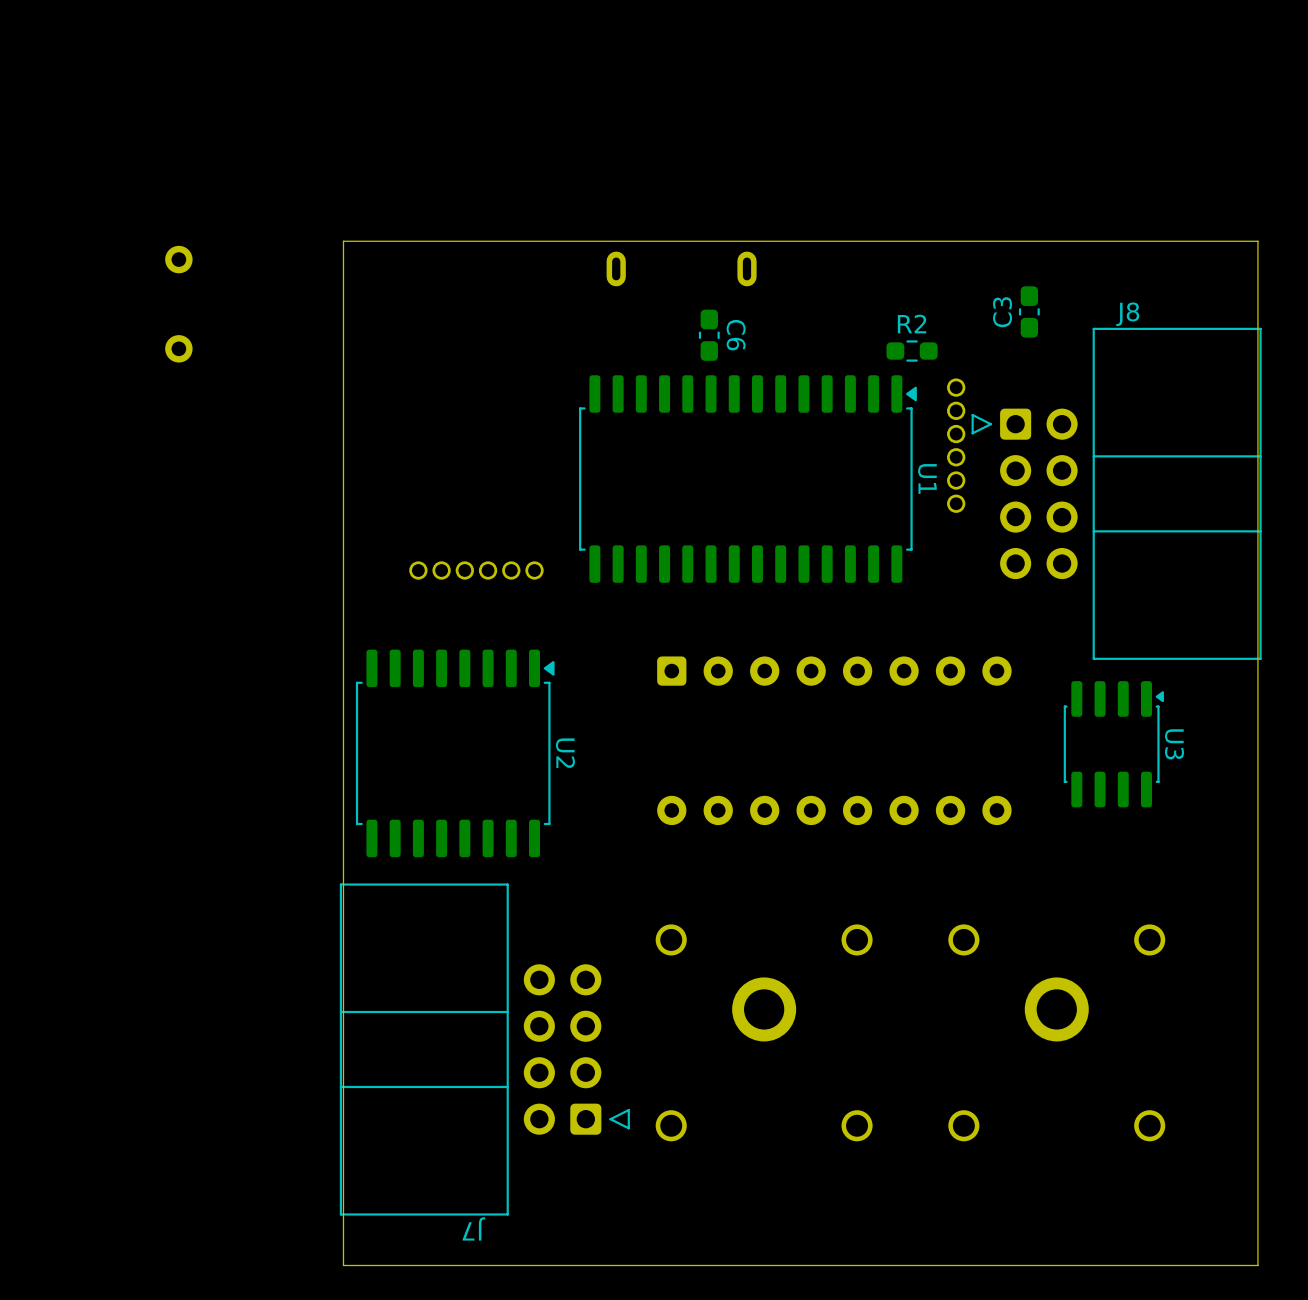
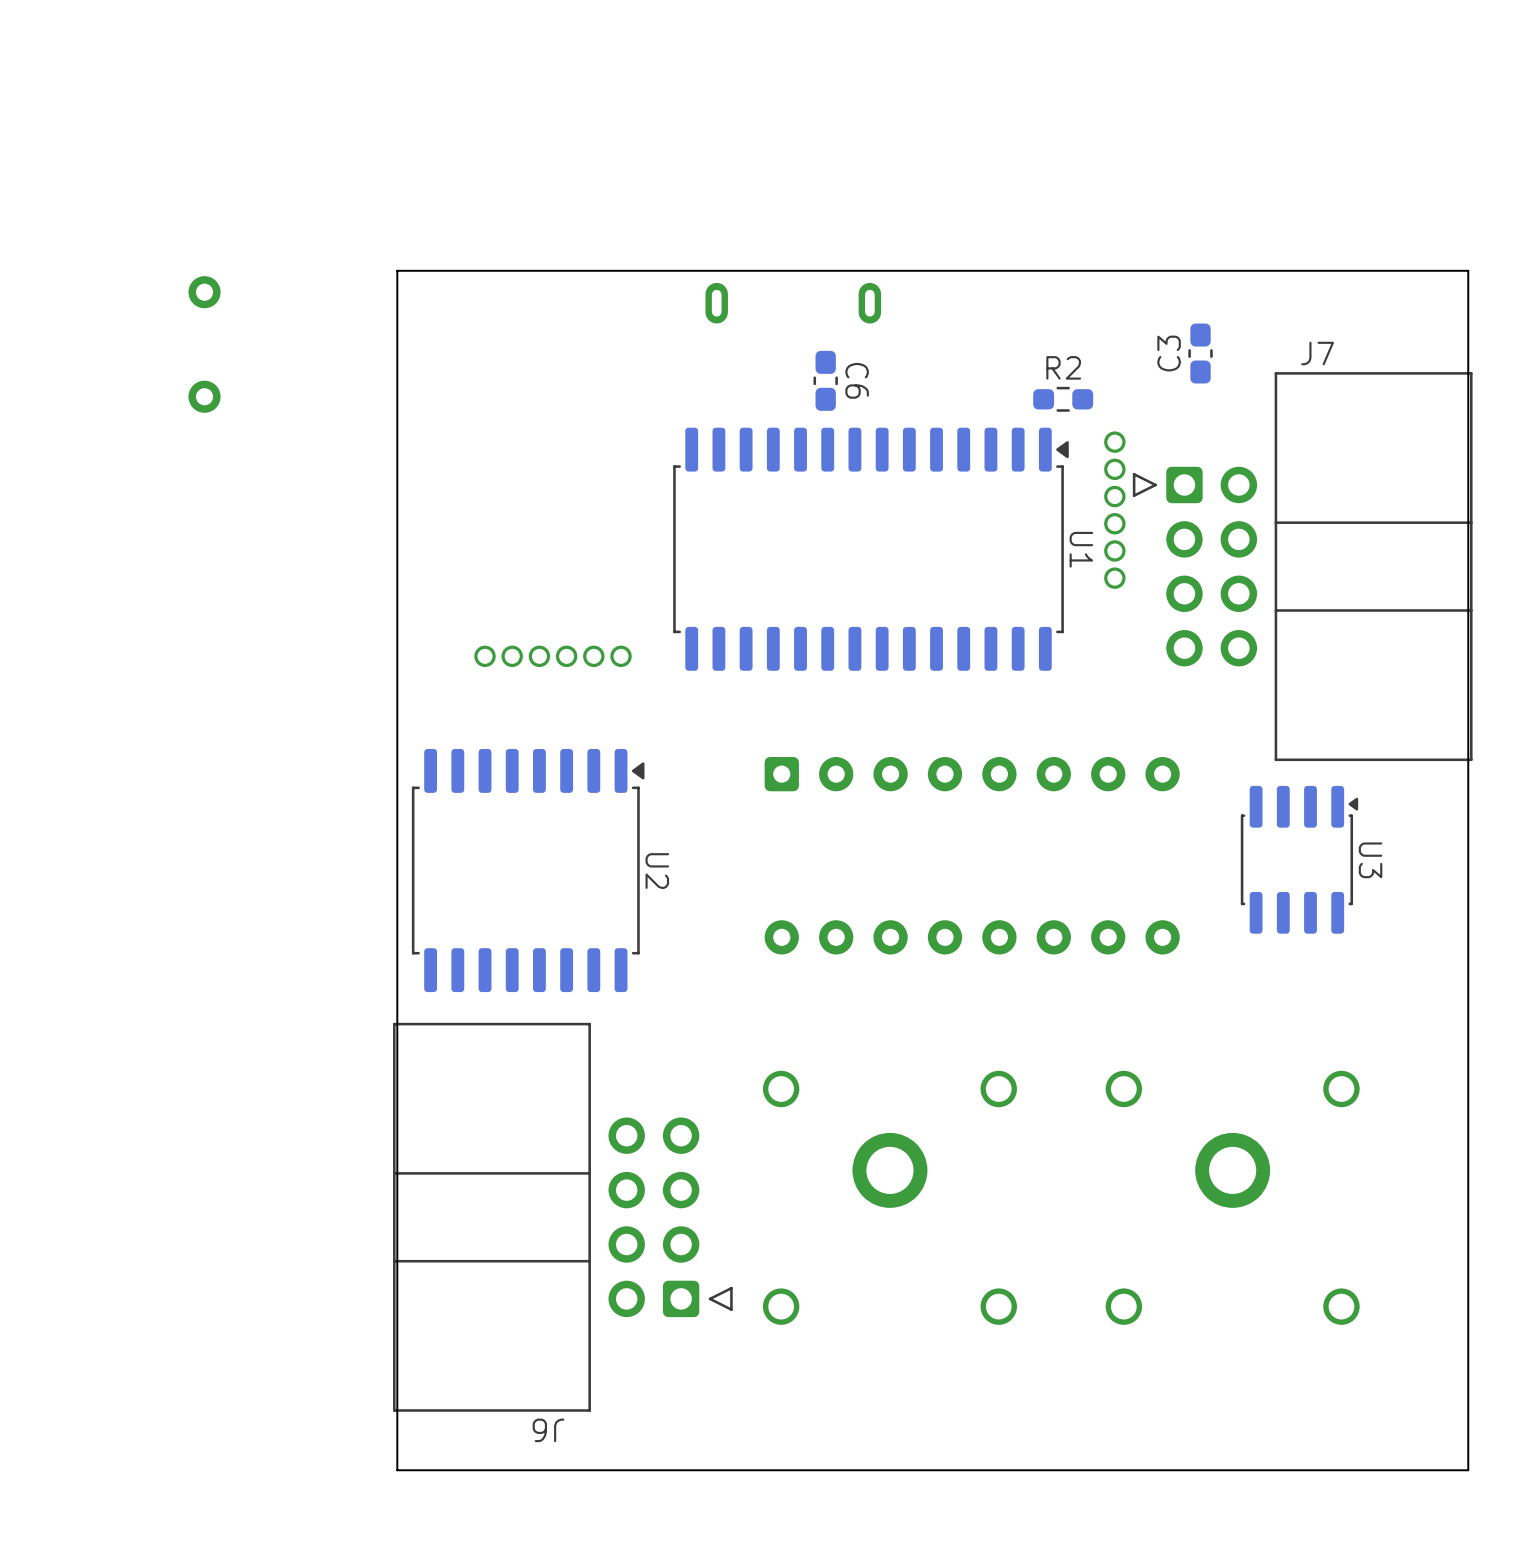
J8 name: J8 (1127, 314) -> J7 (1317, 353)
J7 name: J7 (473, 1228) -> J6 (548, 1430)

